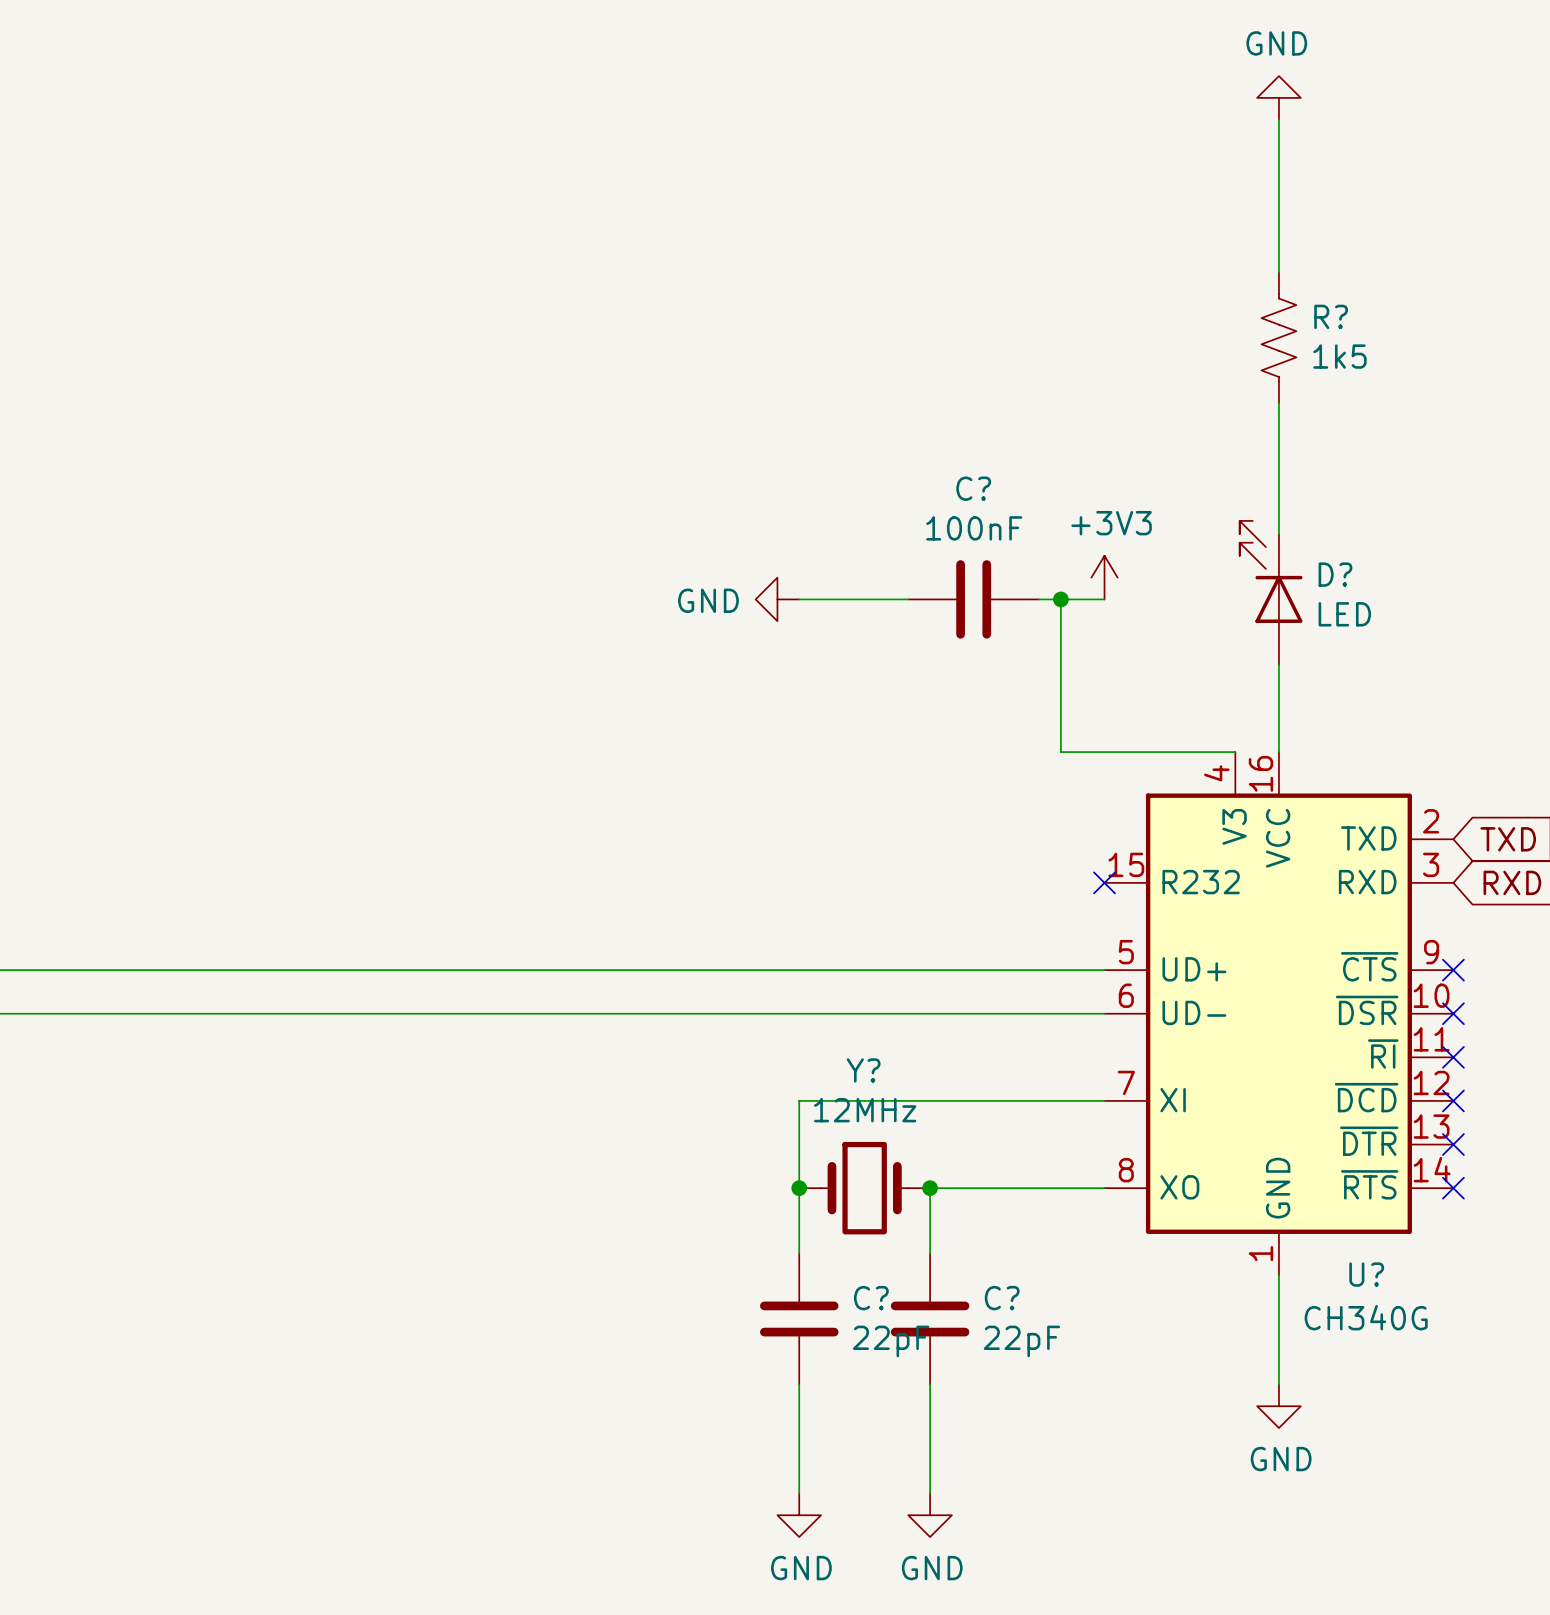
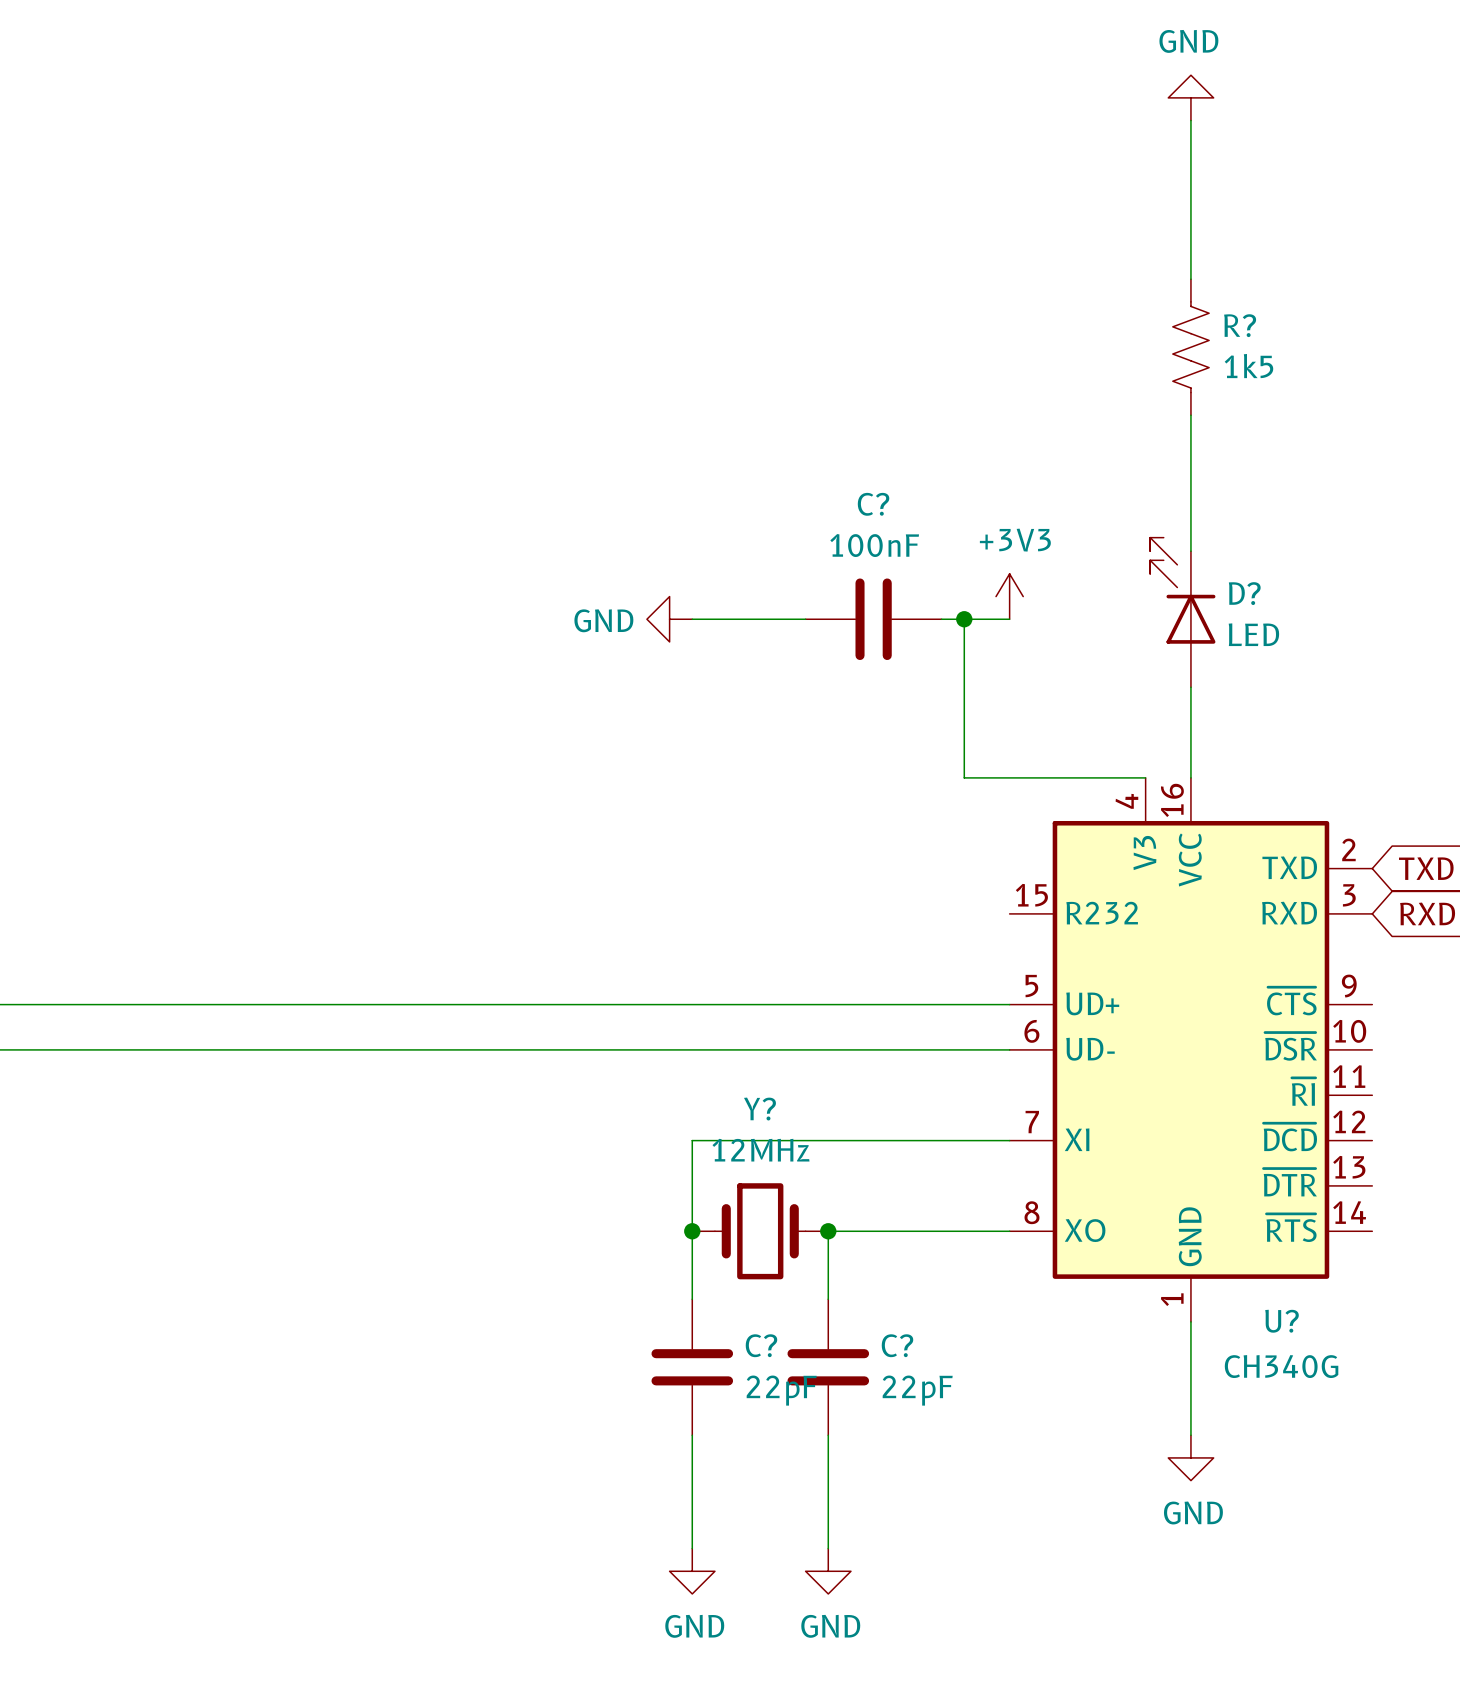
no-connect mark: (1104, 882) -> none
no-connect mark: (1453, 970) -> none
no-connect mark: (1453, 1013) -> none
no-connect mark: (1453, 1057) -> none
no-connect mark: (1453, 1100) -> none
no-connect mark: (1453, 1144) -> none
no-connect mark: (1453, 1188) -> none

